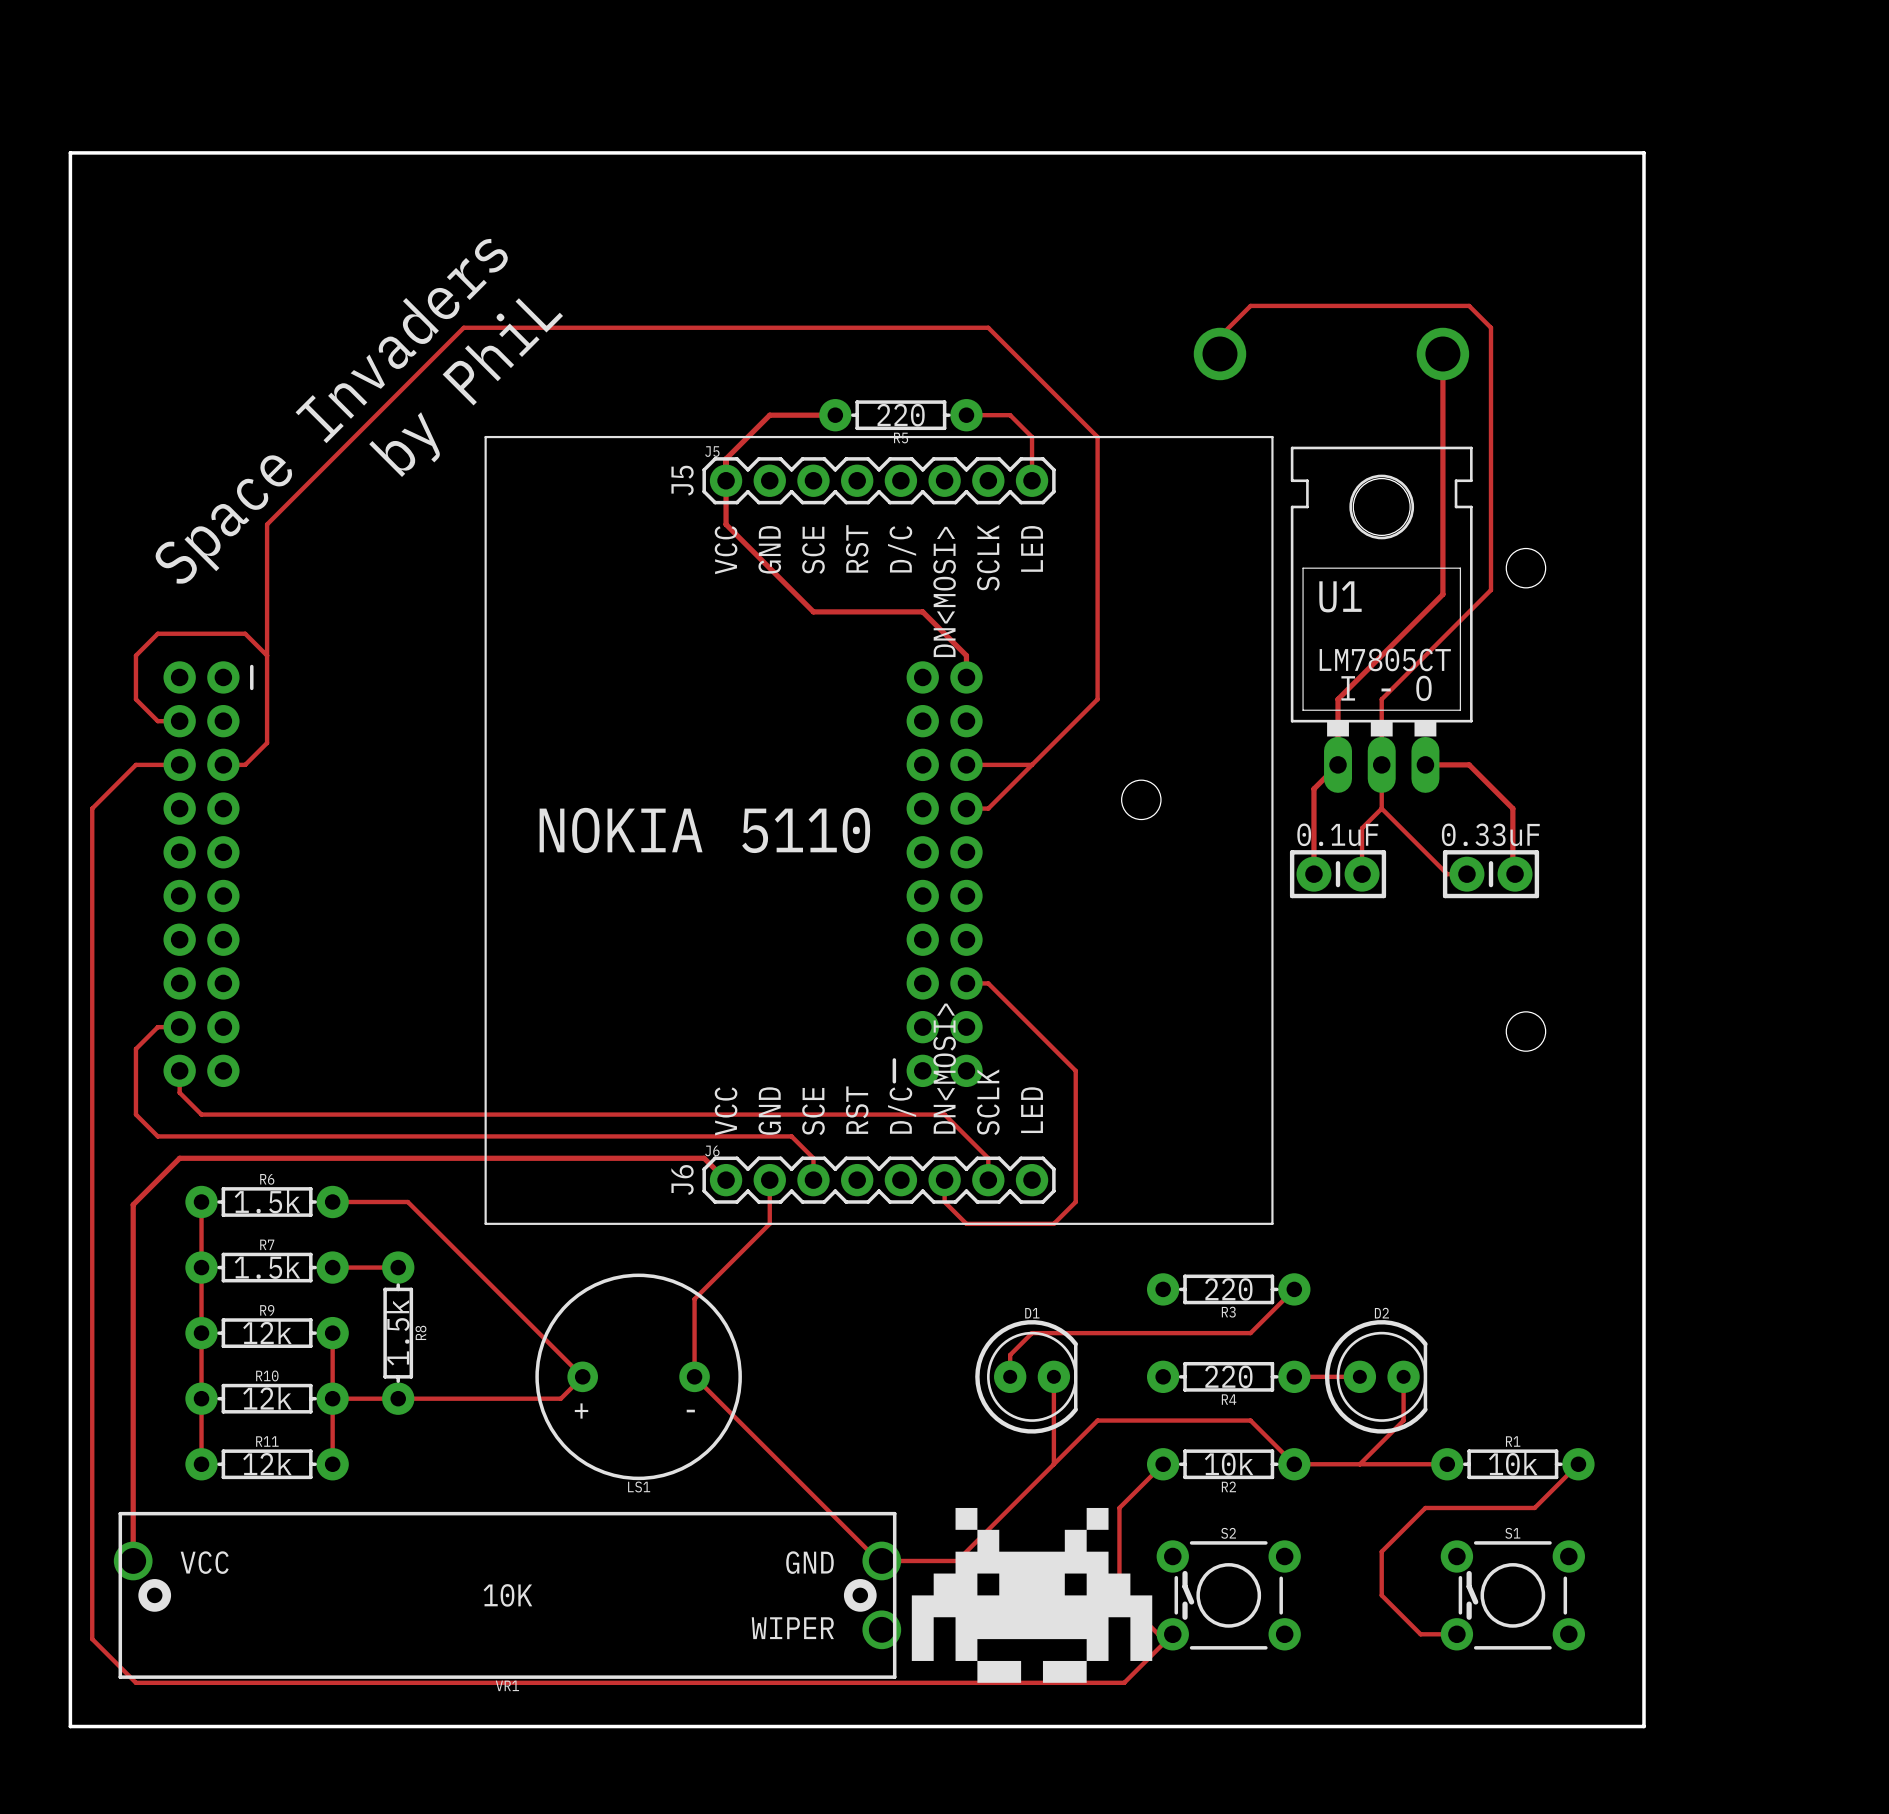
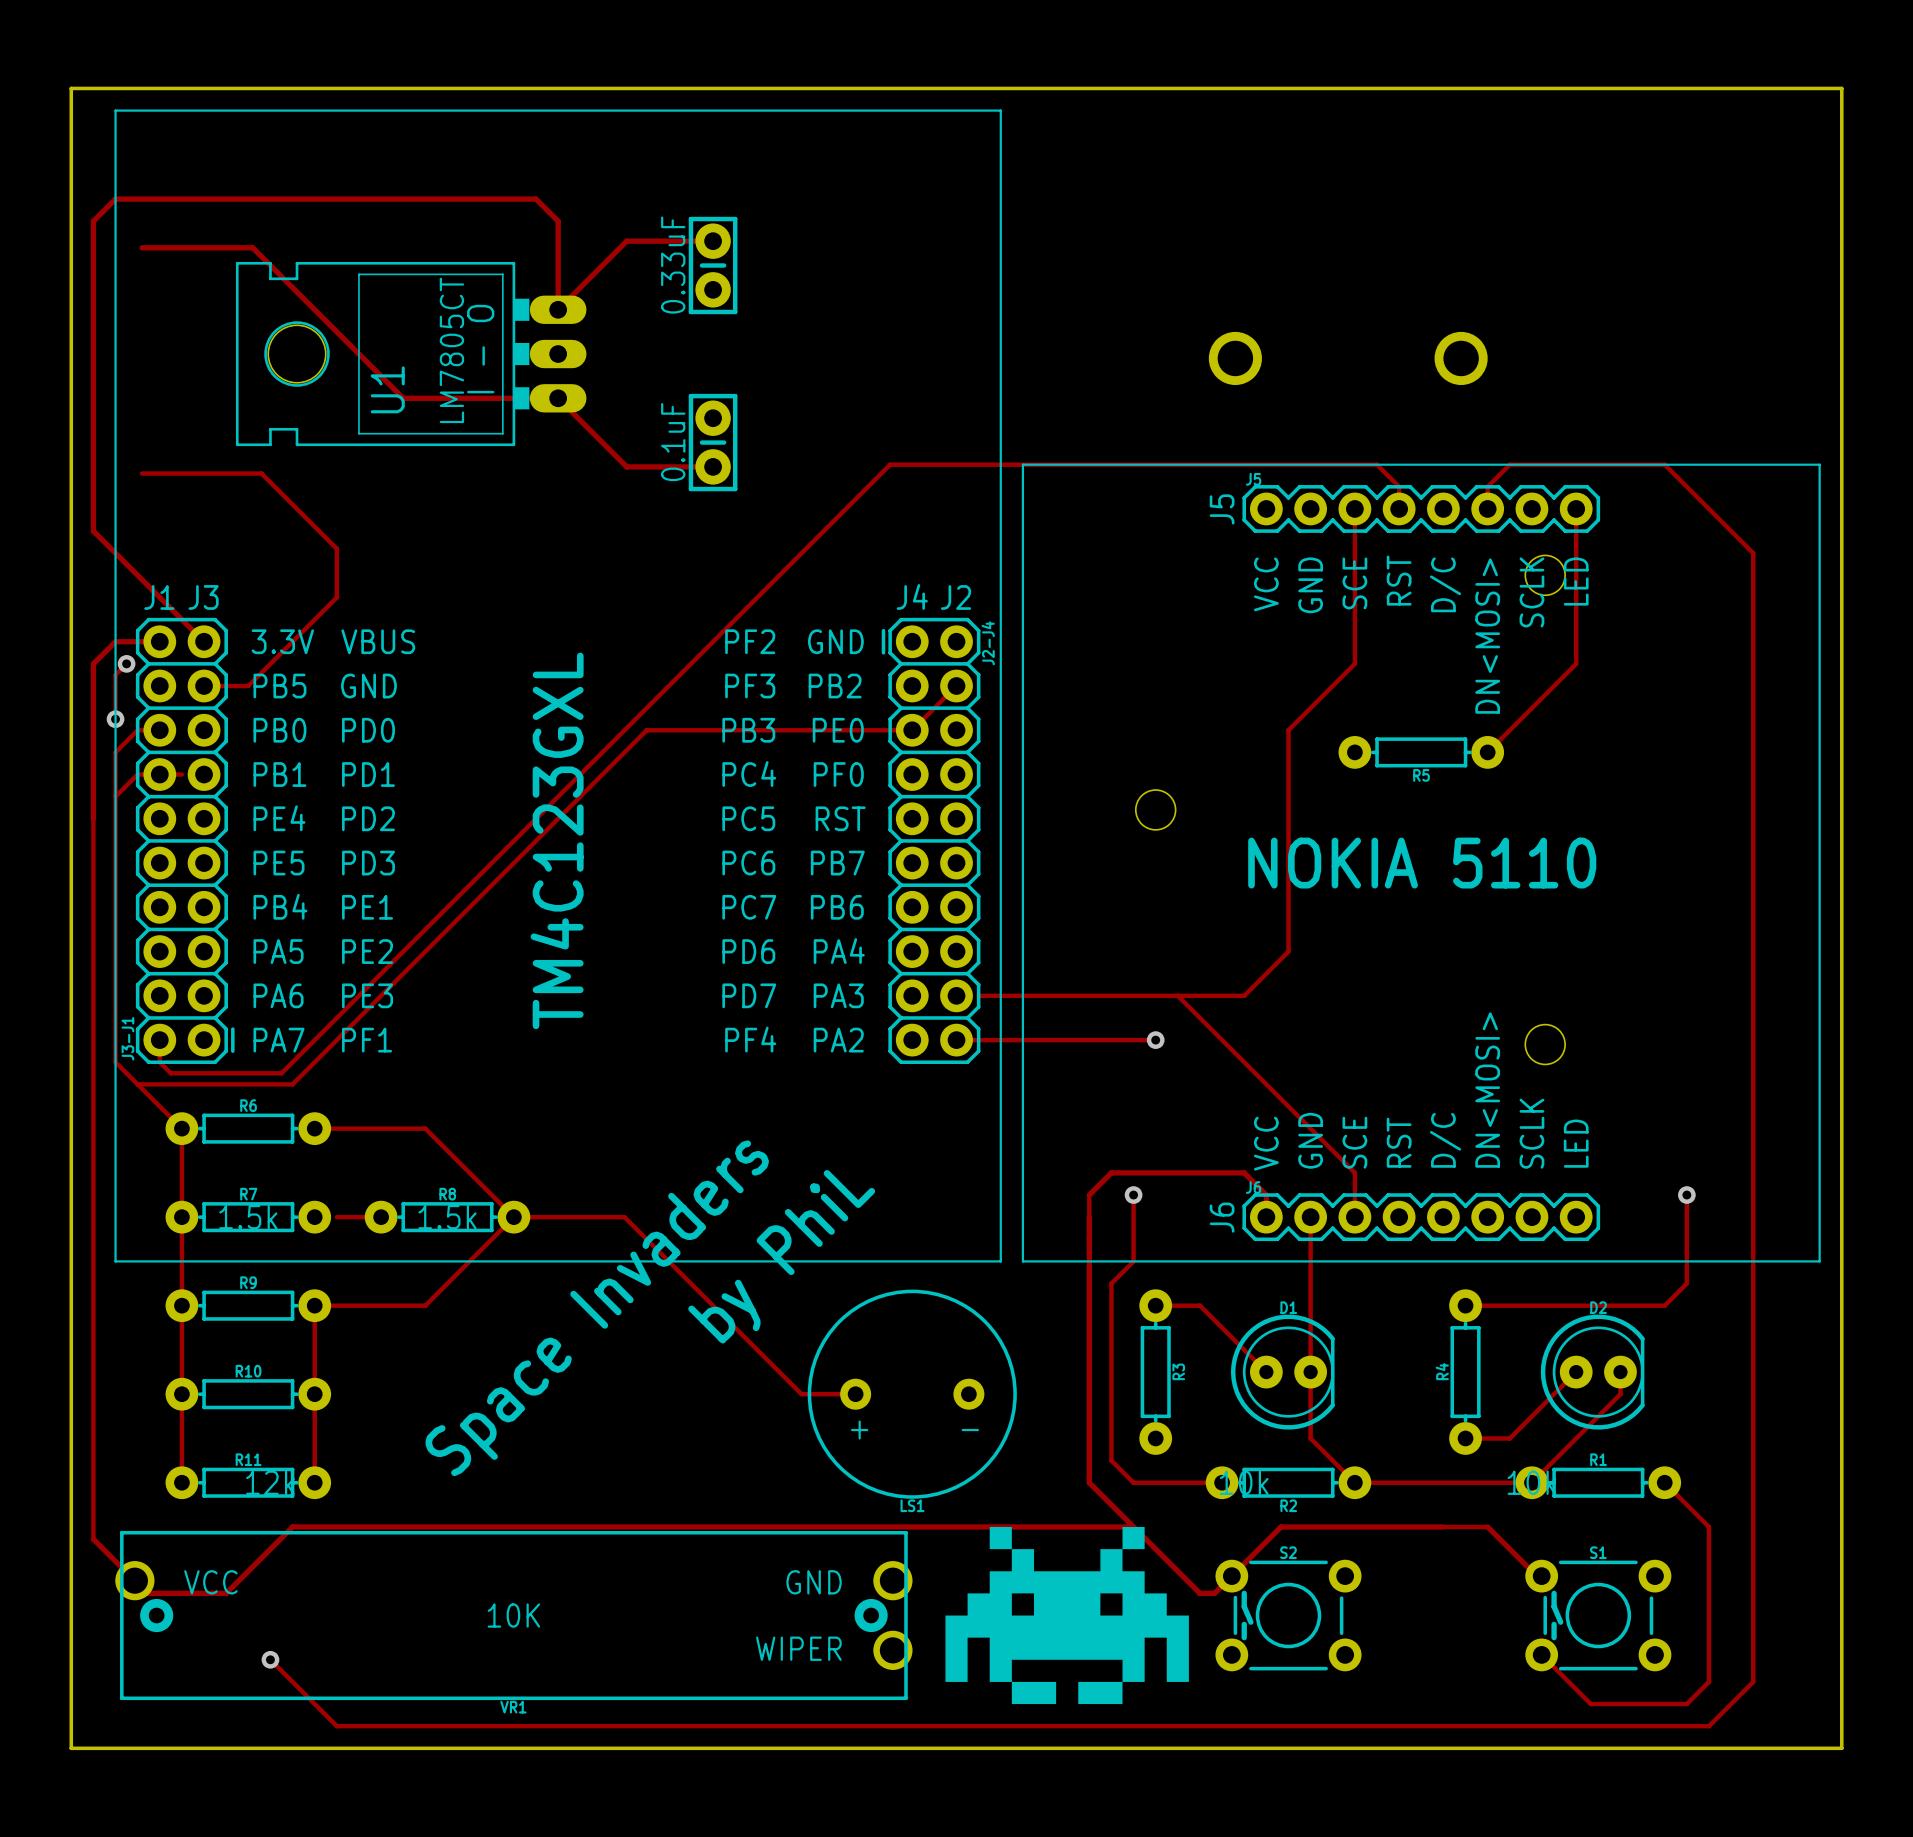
line: none -> (115, 110) (115, 1261) (1000, 1261) (1000, 110) (115, 110)
board edge: (70, 152) (1643, 152) (1643, 1726) -> (71, 154) (71, 88) (1841, 88) (1841, 1748) (1664, 1748)
track: none -> (713, 241) (626, 241) (558, 309) (558, 221) (536, 199) (115, 199) (93, 221) (93, 531) (204, 641)
track: none -> (142, 247) (252, 247) (403, 398) (558, 398) (626, 466) (713, 466)
text: none -> 0.33uF (673, 265)
part: none -> (713, 265)
text: none -> I - O (480, 349)
text: none -> LM7805CT (451, 350)
track: (1219, 353) (1219, 336) (1250, 305) (1469, 305) (1491, 327) (1491, 590) (1381, 699) (1381, 808) -> none
track: (1442, 353) (1442, 594) (1338, 699) (1338, 764) (1313, 788) (1313, 874) -> none
text: by PhiL (466, 387) -> none
text: Space Invaders (331, 411) -> none
track: (835, 415) (769, 415) (726, 458) (726, 524) (813, 611) (922, 611) (966, 655) (966, 677) -> none
R5 position: (900, 415) -> (1421, 752)
text: 220 (901, 415) -> none
track: (966, 415) (1010, 415) (1032, 437) (1032, 480) -> none
line: (485, 437) (1272, 437) (1272, 1223) (485, 1223) (485, 437) -> none
text: none -> 0.1uF (673, 442)
part: none -> (713, 442)
line: none -> (1022, 464) (1819, 464) (1819, 1261) (1022, 1261) (1022, 464)
track: none -> (142, 473) (261, 473) (336, 548) (336, 597) (248, 686) (204, 686)
text: J5 (682, 480) -> none
J5 position: (879, 480) -> (1421, 508)
text: none -> J5 (1222, 509)
track: none -> (1354, 508) (1354, 663) (1288, 730) (1288, 951) (1244, 995) (1000, 995)
track: none -> (1399, 508) (1399, 486) (1377, 464) (890, 464) (281, 1073) (170, 1073) (159, 1062) (159, 1040)
track: none -> (1487, 508) (1487, 486) (1509, 464) (1664, 464) (1753, 553) (1753, 1681) (1708, 1726) (336, 1726) (270, 1659)
track: none -> (1576, 508) (1576, 663) (1487, 752)
text: RST (857, 548) -> none
text: LED (1032, 548) -> none
text rotation: 0° (769, 549) -> 90° clockwise (835, 641)
text position: GND (769, 549) -> GND (835, 641)
text: D/C (902, 549) -> none
text: VCC (726, 550) -> none
text: SCE (813, 550) -> none
text: SCLK (988, 557) -> none
text: none -> RST (1399, 580)
text: none -> LED (1576, 581)
text: none -> GND (1310, 585)
text: none -> D/C (1445, 584)
text: none -> VCC (1266, 584)
text: none -> SCE (1354, 583)
text: none -> SCLK (1531, 592)
text: none -> J1 (159, 597)
text: none -> J3 (203, 597)
text: none -> J4 (912, 596)
text: none -> J2 (956, 597)
text: DN<MOSI> (944, 591) -> none
text: none -> DN<MOSI> (1487, 636)
U1 rotation: 0° (1381, 619) -> 90° counterclockwise (411, 354)
U1 position: (1381, 619) -> (411, 354)
text: none -> 3.3V (282, 641)
text: none -> VBUS (378, 641)
text: none -> PF2 (750, 641)
track: none -> (126, 663) (115, 674) (115, 719)
via: none -> (126, 663)
track: (267, 655) (245, 633) (157, 633) (135, 655) (135, 699) (157, 721) (179, 721) -> none
text: LM7805CT (1385, 659) -> none
text: none -> PB5 (279, 686)
text: none -> GND (368, 686)
text: none -> PF3 (750, 686)
text: none -> PB2 (835, 686)
track: none -> (956, 686) (912, 730) (646, 730) (292, 1084) (137, 1084)
text: I - O (1386, 688) -> none
via: none -> (115, 719)
track: none -> (159, 730) (137, 730) (115, 752) (115, 1062) (181, 1128) (181, 1482)
text: none -> PB0 (279, 730)
text: none -> PD0 (368, 730)
text: none -> PB3 (748, 730)
text: none -> PE0 (838, 730)
track: (223, 764) (245, 764) (267, 743) (267, 524) (463, 327) (988, 327) (1097, 437) (1097, 699) (988, 808) (966, 808) -> none
text: none -> PB1 (279, 774)
text: none -> PD1 (368, 774)
text: none -> PC4 (749, 774)
text: none -> PF0 (838, 774)
track: (966, 764) (1032, 764) -> none
track: (1425, 764) (1469, 764) (1512, 808) (1512, 871) (1515, 874) -> none
track: (114, 786) (92, 808) -> (159, 641) (115, 641) (93, 663) (93, 818)
text: none -> PE4 (279, 818)
text: none -> PD2 (368, 818)
text: none -> PC5 (748, 818)
text: none -> RST (840, 818)
track: (1381, 808) (1447, 874) (1466, 874) -> none
track: (1381, 808) (1362, 828) (1362, 874) -> none
J3-J1: none -> (185, 840)
text: NOKIA 5110 (704, 830) -> none
J2-J4: none -> (931, 840)
text: none -> TM4C123GXL (557, 840)
text: 0.1uF (1337, 834) -> none
text: 0.33uF (1490, 834) -> none
text: none -> PE5 (279, 863)
text: none -> PD3 (368, 863)
text: none -> PC6 (748, 863)
text: none -> PB7 (837, 863)
text: none -> NOKIA 5110 (1422, 863)
part: (208, 874) -> none
part: (937, 874) -> none
part: (1338, 874) -> none
part: (1491, 874) -> none
text: none -> PB4 (280, 906)
text: none -> PE1 (367, 907)
text: none -> PC7 (749, 907)
text: none -> PB6 (837, 907)
text: none -> PA5 (278, 951)
text: none -> PE2 (367, 951)
text: none -> PD6 (748, 951)
text: none -> PA4 (839, 951)
text: none -> PA6 (278, 995)
text: none -> PE3 (367, 995)
text: none -> PD7 (749, 995)
text: none -> PA3 (838, 995)
track: (988, 983) (1075, 1070) (1075, 1180) -> (1266, 1217) (1266, 1195) (1244, 1172) (1111, 1172) (1089, 1195)
track: none -> (1177, 995) (1354, 1172) (1354, 1217)
text: none -> PA2 (838, 1040)
track: (179, 1027) (157, 1027) (135, 1049) (135, 1114) (157, 1136) (791, 1136) (813, 1158) (813, 1180) -> none
text: none -> PA7 (279, 1040)
text: none -> PF1 (367, 1040)
text: none -> PF4 (750, 1039)
track: none -> (956, 1040) (1155, 1040)
via: none -> (1155, 1040)
text: DN<MOSI> (944, 1068) -> none
track: (179, 1070) (179, 1092) (201, 1114) (310, 1114) -> none
text: none -> DN<MOSI> (1487, 1090)
text: SCLK (988, 1102) -> none
text: RST (857, 1110) -> none
text: D/C (902, 1110) -> none
text: LED (1032, 1110) -> none
text: VCC (726, 1111) -> none
text: GND (769, 1111) -> none
text: SCE (813, 1111) -> none
track: (420, 1114) (944, 1114) (988, 1158) (988, 1180) -> (425, 1128) (513, 1217)
text: none -> SCLK (1531, 1133)
text: none -> GND (1310, 1140)
text: none -> RST (1399, 1142)
text: none -> D/C (1445, 1140)
text: none -> LED (1576, 1143)
text: none -> VCC (1266, 1143)
text: none -> SCE (1354, 1142)
text: J6 (682, 1180) -> none
track: (726, 1180) (704, 1158) (179, 1158) (133, 1204) (133, 1560) -> none
track: (769, 1180) (769, 1223) (694, 1299) (694, 1376) (878, 1560) (957, 1560) (1097, 1420) (1250, 1420) (1294, 1464) (1338, 1464) -> (1310, 1217) (1310, 1438) (1354, 1482)
J6 position: (879, 1180) -> (1421, 1217)
track: (944, 1180) (944, 1201) (966, 1223) (1053, 1223) (1075, 1201) -> none
track: none -> (1133, 1195) (1133, 1261) (1111, 1283) (1111, 1460) (1133, 1482) (1222, 1482)
via: none -> (1133, 1195)
track: none -> (1686, 1195) (1686, 1283) (1664, 1305) (1465, 1305)
via: none -> (1686, 1195)
track: (201, 1201) (201, 1464) -> none
text position: 1.5k (267, 1201) -> 1.5k (248, 1217)
R6 position: (267, 1201) -> (248, 1128)
track: (376, 1201) (407, 1201) (582, 1376) (560, 1398) (332, 1398) -> none
text: none -> 1.5k (447, 1217)
track: none -> (513, 1217) (425, 1305) (314, 1305) (314, 1482)
track: none -> (513, 1217) (624, 1217) (801, 1394) (855, 1394)
text: none -> J6 (1222, 1217)
text: none -> by PhiL (781, 1256)
text: 1.5k (267, 1267) -> none
R7 position: (267, 1267) -> (248, 1217)
track: (332, 1267) (398, 1267) -> none
text: none -> Space Invaders (597, 1308)
track: none -> (1155, 1305) (1199, 1305) (1266, 1372)
text: 220 (1228, 1289) -> none
R3 rotation: 0° (1228, 1289) -> 90° clockwise (1155, 1372)
R3 position: (1228, 1289) -> (1155, 1372)
track: (1294, 1289) (1250, 1333) (1032, 1333) (1010, 1354) (1010, 1376) -> none
text: 12k (267, 1332) -> none
text: 1.5k (397, 1332) -> none
R9 position: (267, 1333) -> (248, 1305)
track: (332, 1333) (332, 1464) -> none
R8 rotation: 0° (398, 1333) -> 90° clockwise (447, 1217)
R8 position: (398, 1333) -> (447, 1217)
track: none -> (1576, 1372) (1509, 1438) (1465, 1438)
track: none -> (1620, 1372) (1620, 1394) (1531, 1482) (1465, 1482)
LS1 position: (638, 1376) -> (912, 1394)
D1 position: (1026, 1376) -> (1282, 1372)
track: (1053, 1376) (1053, 1464) -> none
text: 220 (1228, 1376) -> none
R4 rotation: 0° (1228, 1376) -> 90° clockwise (1465, 1372)
R4 position: (1228, 1376) -> (1465, 1372)
track: (1294, 1376) (1359, 1376) -> none
D2 position: (1376, 1376) -> (1592, 1372)
track: (1403, 1376) (1403, 1420) (1359, 1464) -> none
text: 12k (267, 1398) -> none
R10 position: (267, 1398) -> (248, 1394)
text position: + (581, 1411) -> + (859, 1430)
text position: - (690, 1411) -> - (970, 1430)
R11 position: (267, 1464) -> (248, 1482)
track: (1163, 1464) (1119, 1507) (1119, 1595) (1158, 1634) (1172, 1634) (1124, 1682) (135, 1682) (92, 1639) (92, 1520) -> (1133, 1527) (292, 1527) (226, 1593) (147, 1593) (93, 1539)
R2 position: (1228, 1464) -> (1288, 1482)
R1 position: (1512, 1464) -> (1598, 1482)
track: (1578, 1464) (1534, 1507) (1469, 1507) -> (1541, 1576) (1536, 1576) (1487, 1527)
track: none -> (1664, 1482) (1708, 1527) (1708, 1681) (1686, 1704) (1590, 1704) (1541, 1654)
drawing: [911, 1507, 1000, 1661] -> none
drawing: none -> [989, 1527, 1034, 1572]
drawing: [1064, 1507, 1109, 1552] -> none
drawing: none -> [1100, 1527, 1189, 1682]
track: (1425, 1507) (1381, 1551) (1381, 1595) (1420, 1634) (1456, 1634) -> (1443, 1527) (1280, 1527) (1214, 1593) (1199, 1593) (1089, 1482) (1089, 1217)
drawing: none -> [989, 1593, 1012, 1616]
drawing: [999, 1573, 1022, 1596] -> none
drawing: none -> [1078, 1593, 1101, 1616]
drawing: [1086, 1573, 1109, 1596] -> none
line: (1185, 1573) (1185, 1586) (1191, 1601) -> (1244, 1593) (1244, 1606) (1250, 1622)
line: (1469, 1573) (1469, 1586) (1475, 1601) -> (1554, 1593) (1554, 1606) (1560, 1622)
S2 position: (1228, 1595) -> (1288, 1615)
S1 position: (1512, 1595) -> (1598, 1615)
line: (1185, 1604) (1185, 1617) -> (1244, 1624) (1244, 1637)
line: (1469, 1604) (1469, 1617) -> (1554, 1624) (1554, 1637)
drawing: none -> [945, 1637, 968, 1682]
drawing: [955, 1617, 1000, 1683] -> none
drawing: none -> [1100, 1637, 1145, 1705]
drawing: [1130, 1617, 1153, 1661] -> none
via: none -> (270, 1659)
drawing: none -> [989, 1659, 1012, 1682]
drawing: [1086, 1639, 1109, 1661] -> none
drawing: none -> [1033, 1681, 1057, 1705]
drawing: [1042, 1660, 1065, 1683] -> none

